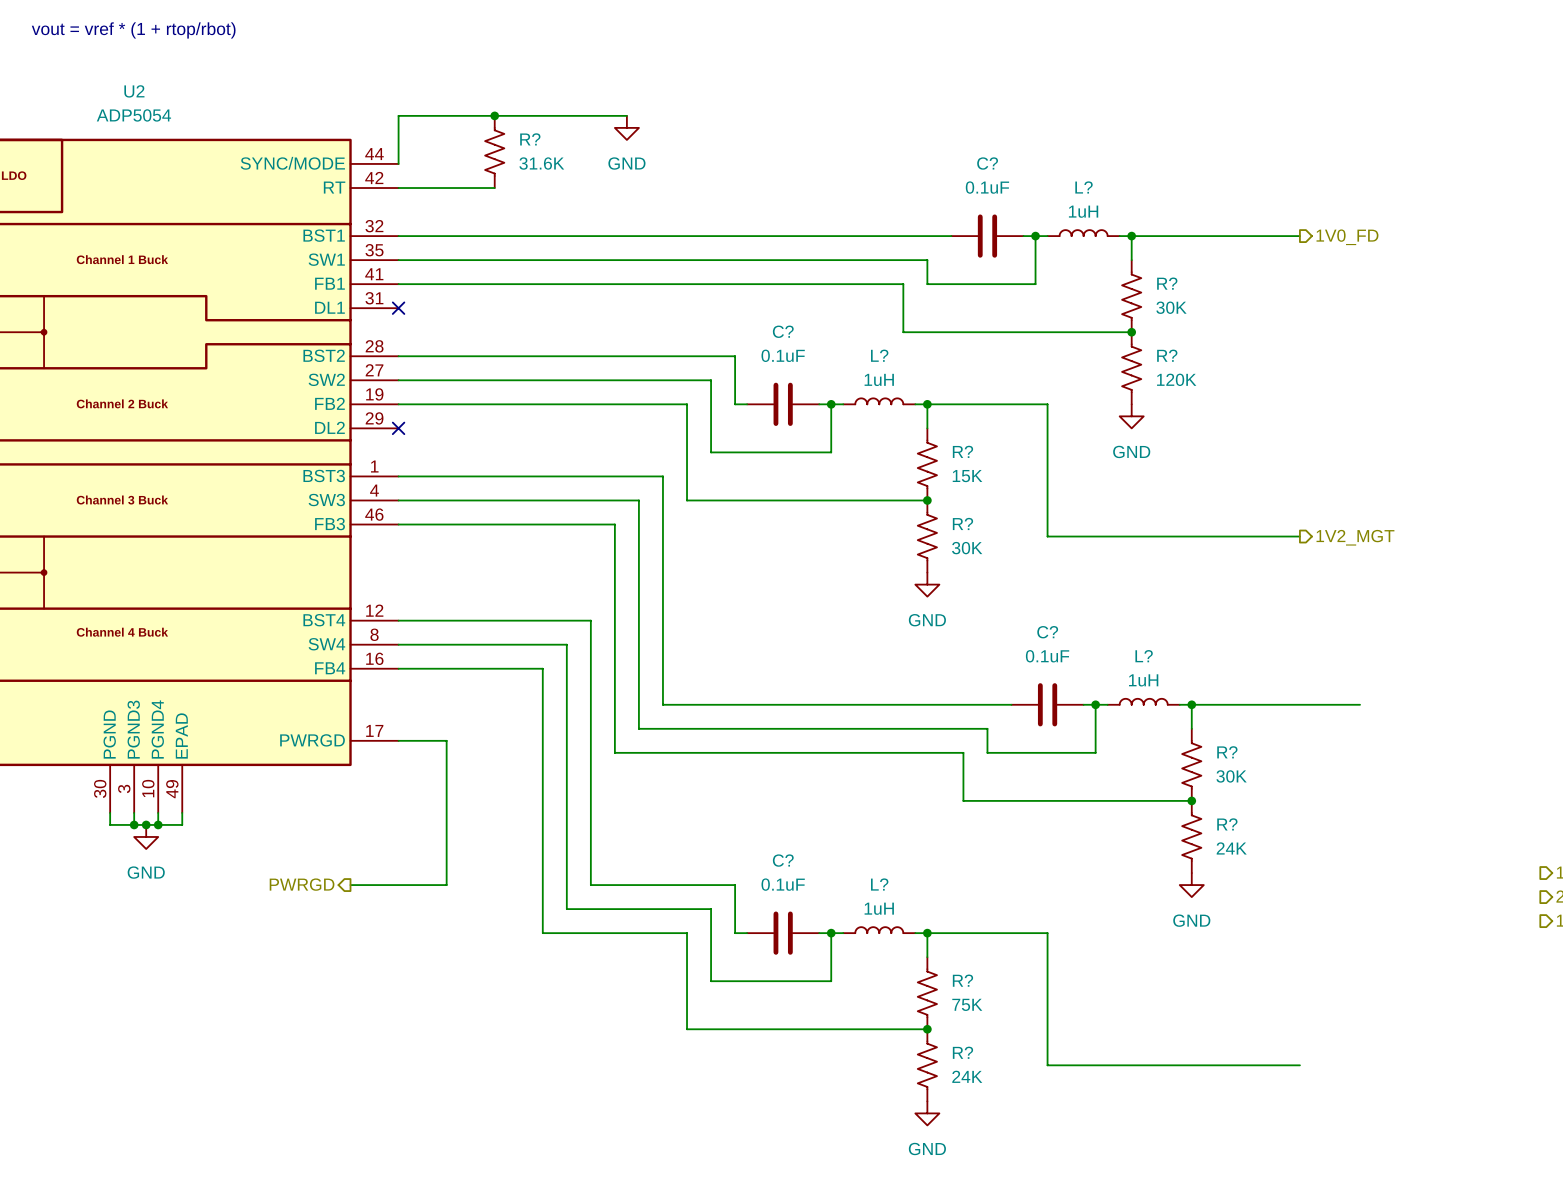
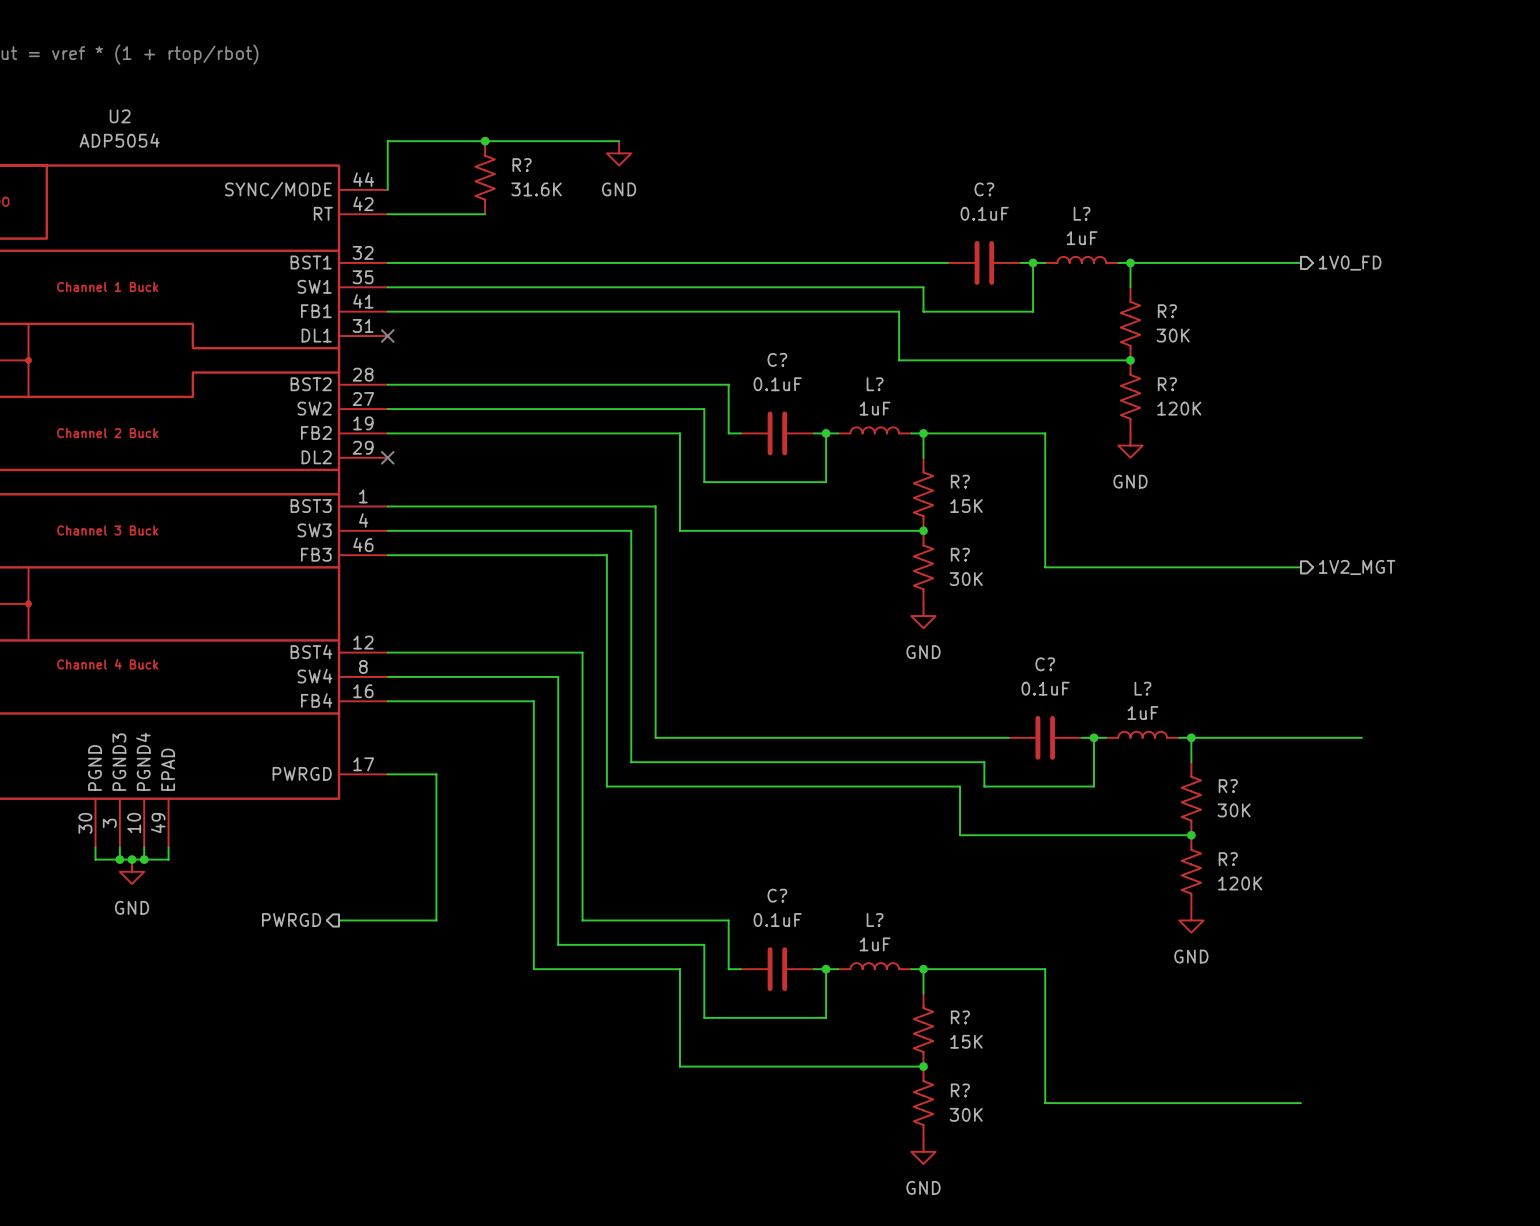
L? value: 1uH (1083, 211) -> 1uF (1082, 238)
L? value: 1uH (879, 379) -> 1uF (875, 408)
L? value: 1uH (1143, 680) -> 1uF (1142, 713)
R? value: 24K (1231, 848) -> 120K (1240, 883)
L? value: 1uH (879, 908) -> 1uF (875, 944)
R? value: 75K (967, 1004) -> 15K (966, 1041)
R? value: 24K (967, 1076) -> 30K (966, 1114)

